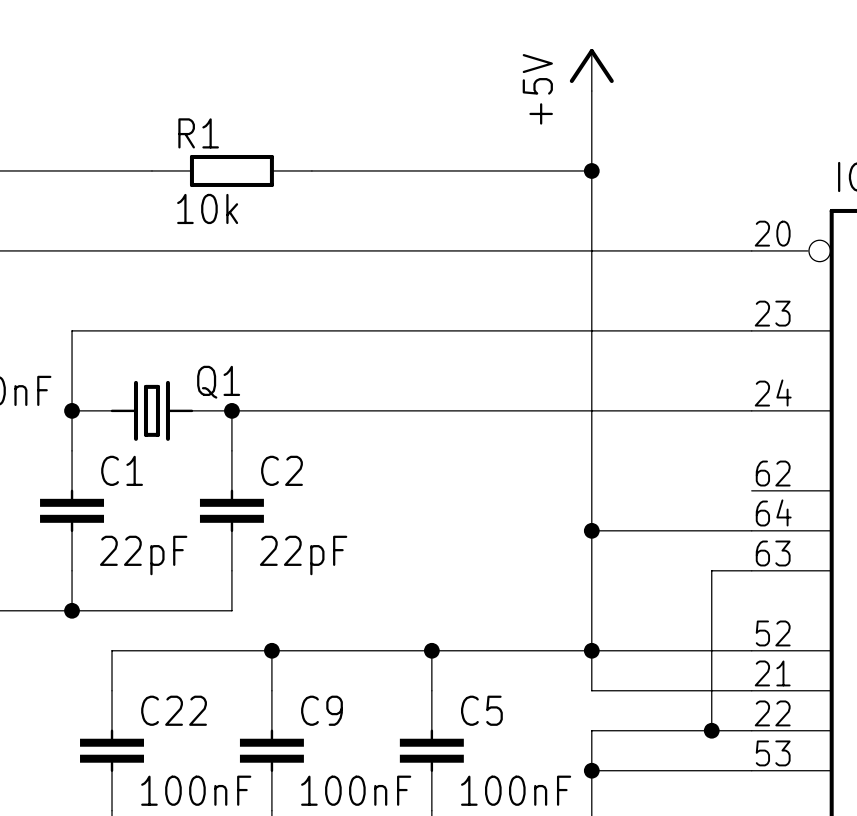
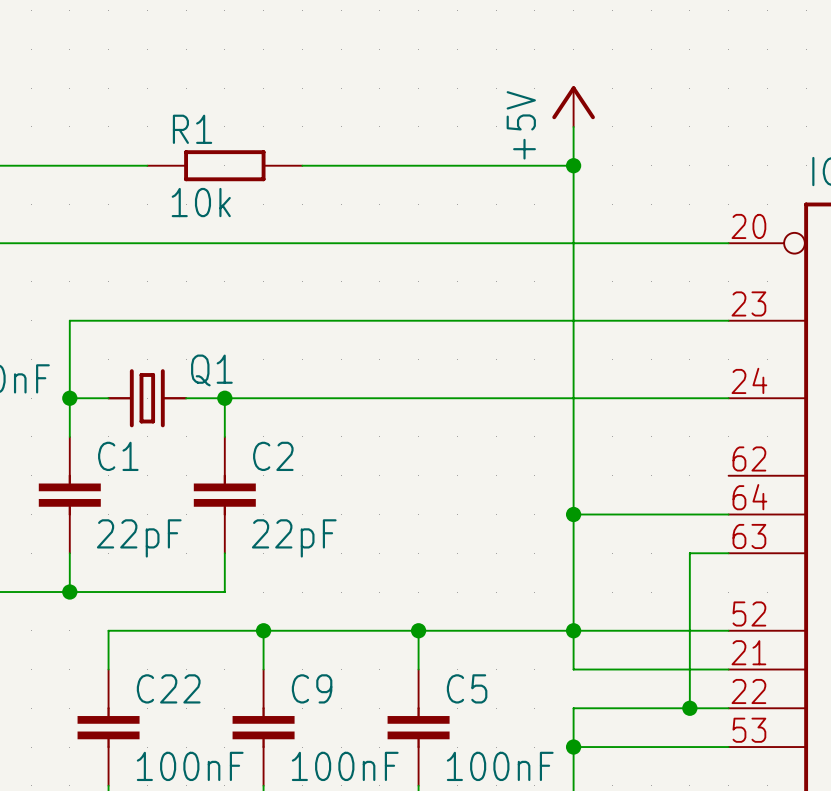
power symbol position: +5V (591, 70) -> +5V (573, 106)

